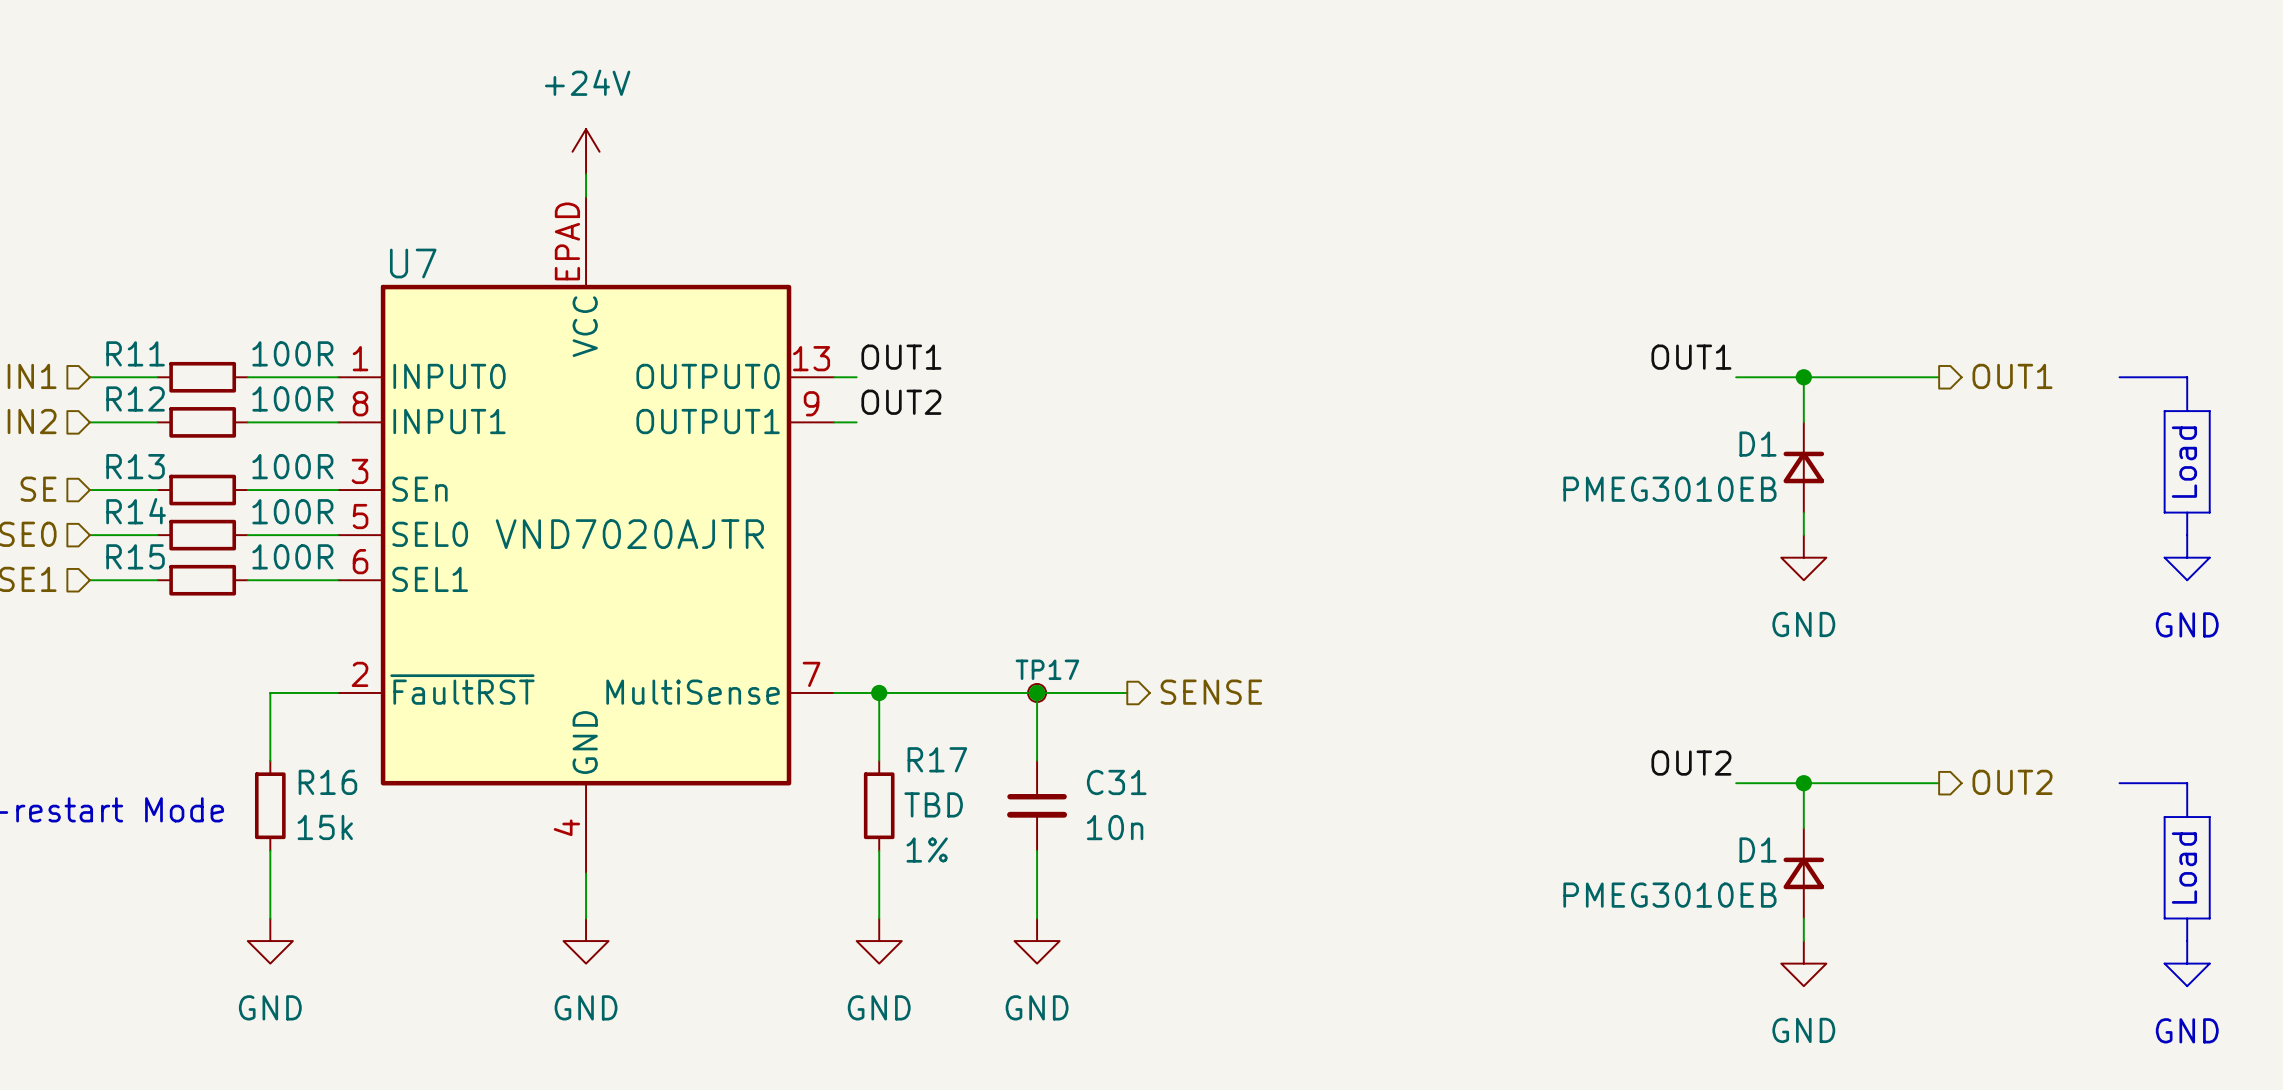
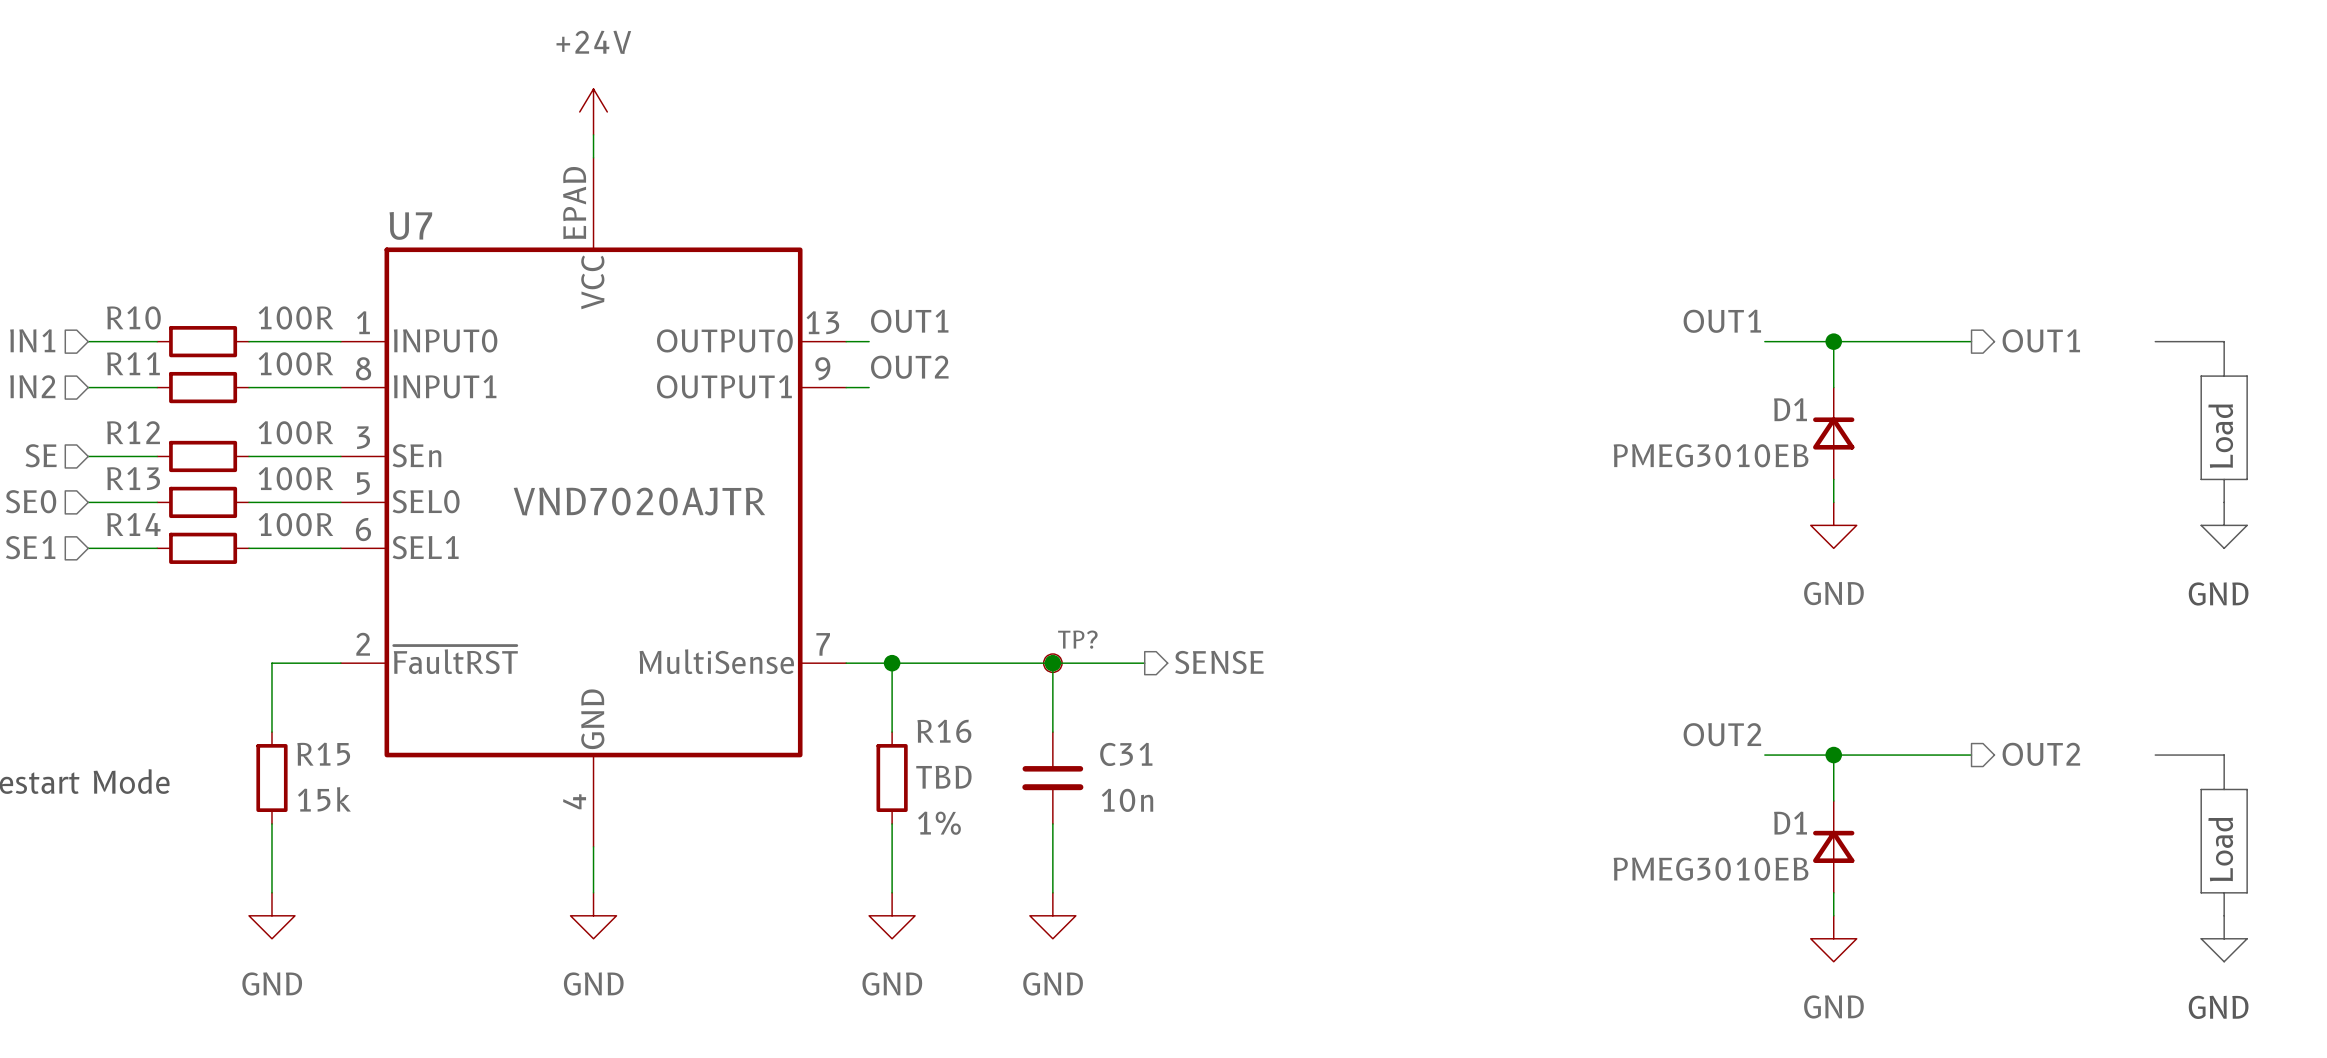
R11 name: R11 (135, 353) -> R10 (133, 317)
R12 name: R12 (135, 398) -> R11 (133, 363)
R13 name: R13 (135, 466) -> R12 (133, 432)
R14 name: R14 (136, 511) -> R13 (133, 478)
R15 name: R15 (135, 556) -> R14 (133, 524)
TP17 name: TP17 (1047, 669) -> TP? (1077, 639)
R17 name: R17 (937, 759) -> R16 (944, 731)
R16 name: R16 (327, 782) -> R15 (323, 754)

